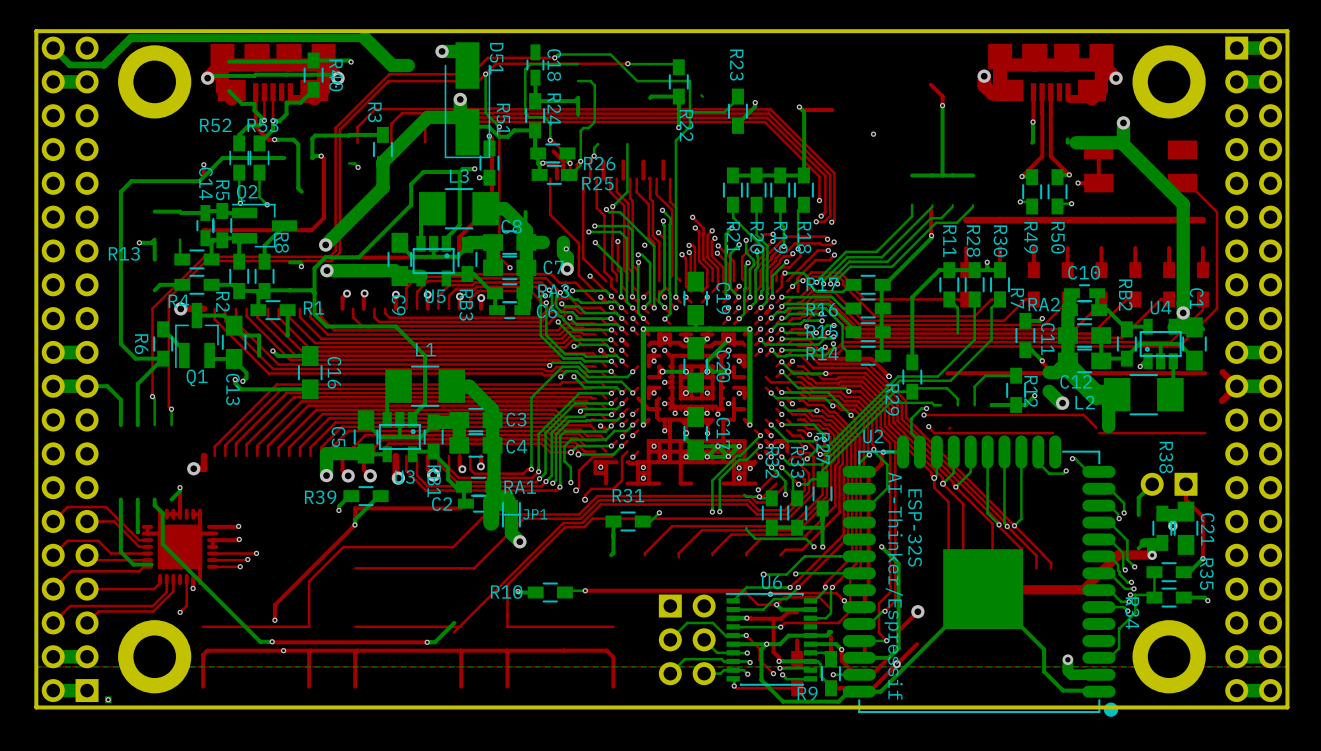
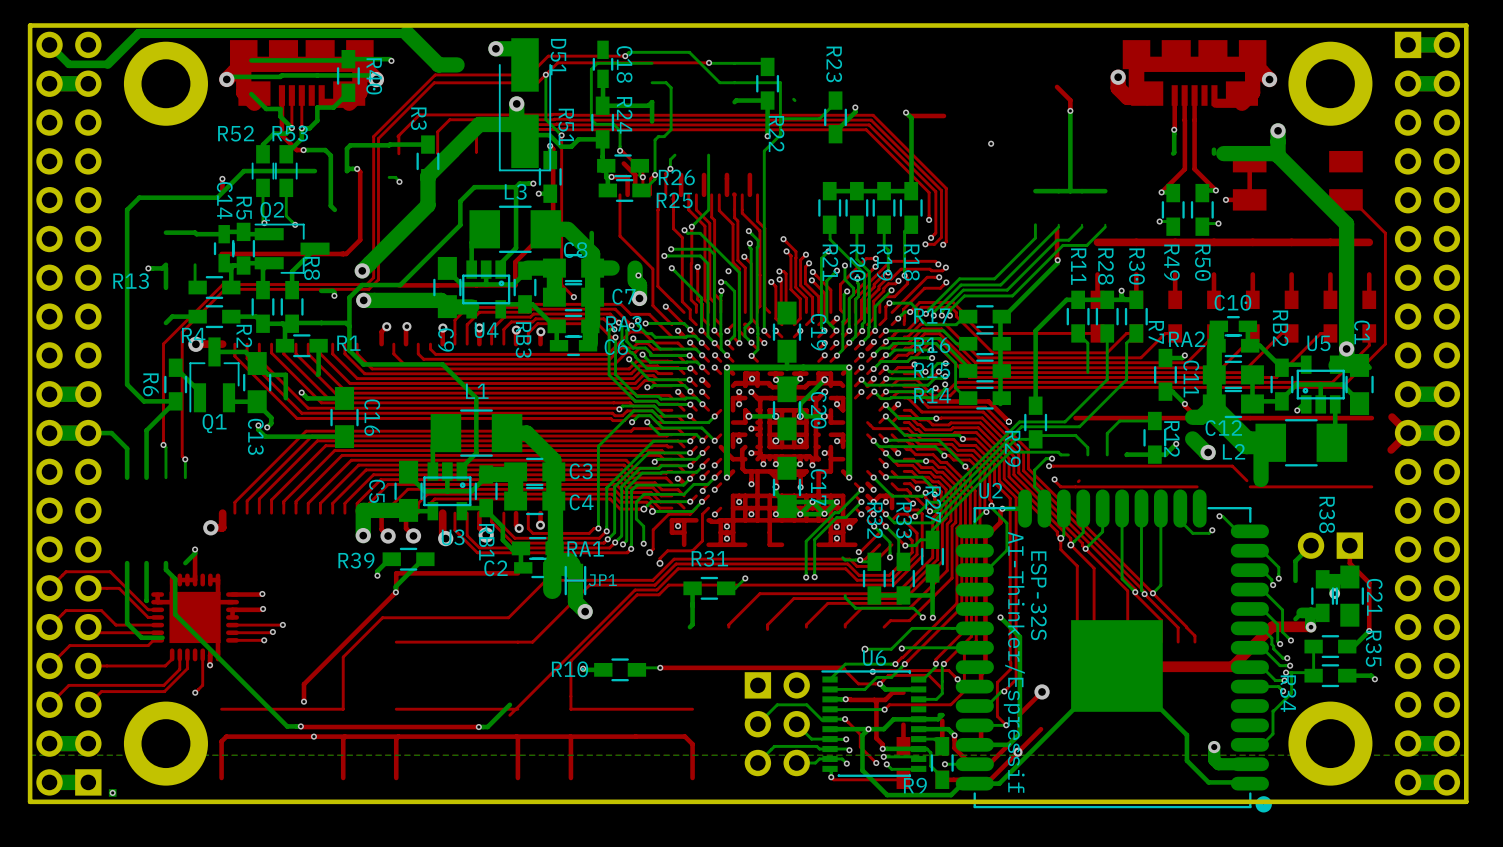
U5 name: U5 (435, 296) -> U4 (486, 330)
U4 name: U4 (1161, 307) -> U5 (1318, 343)

